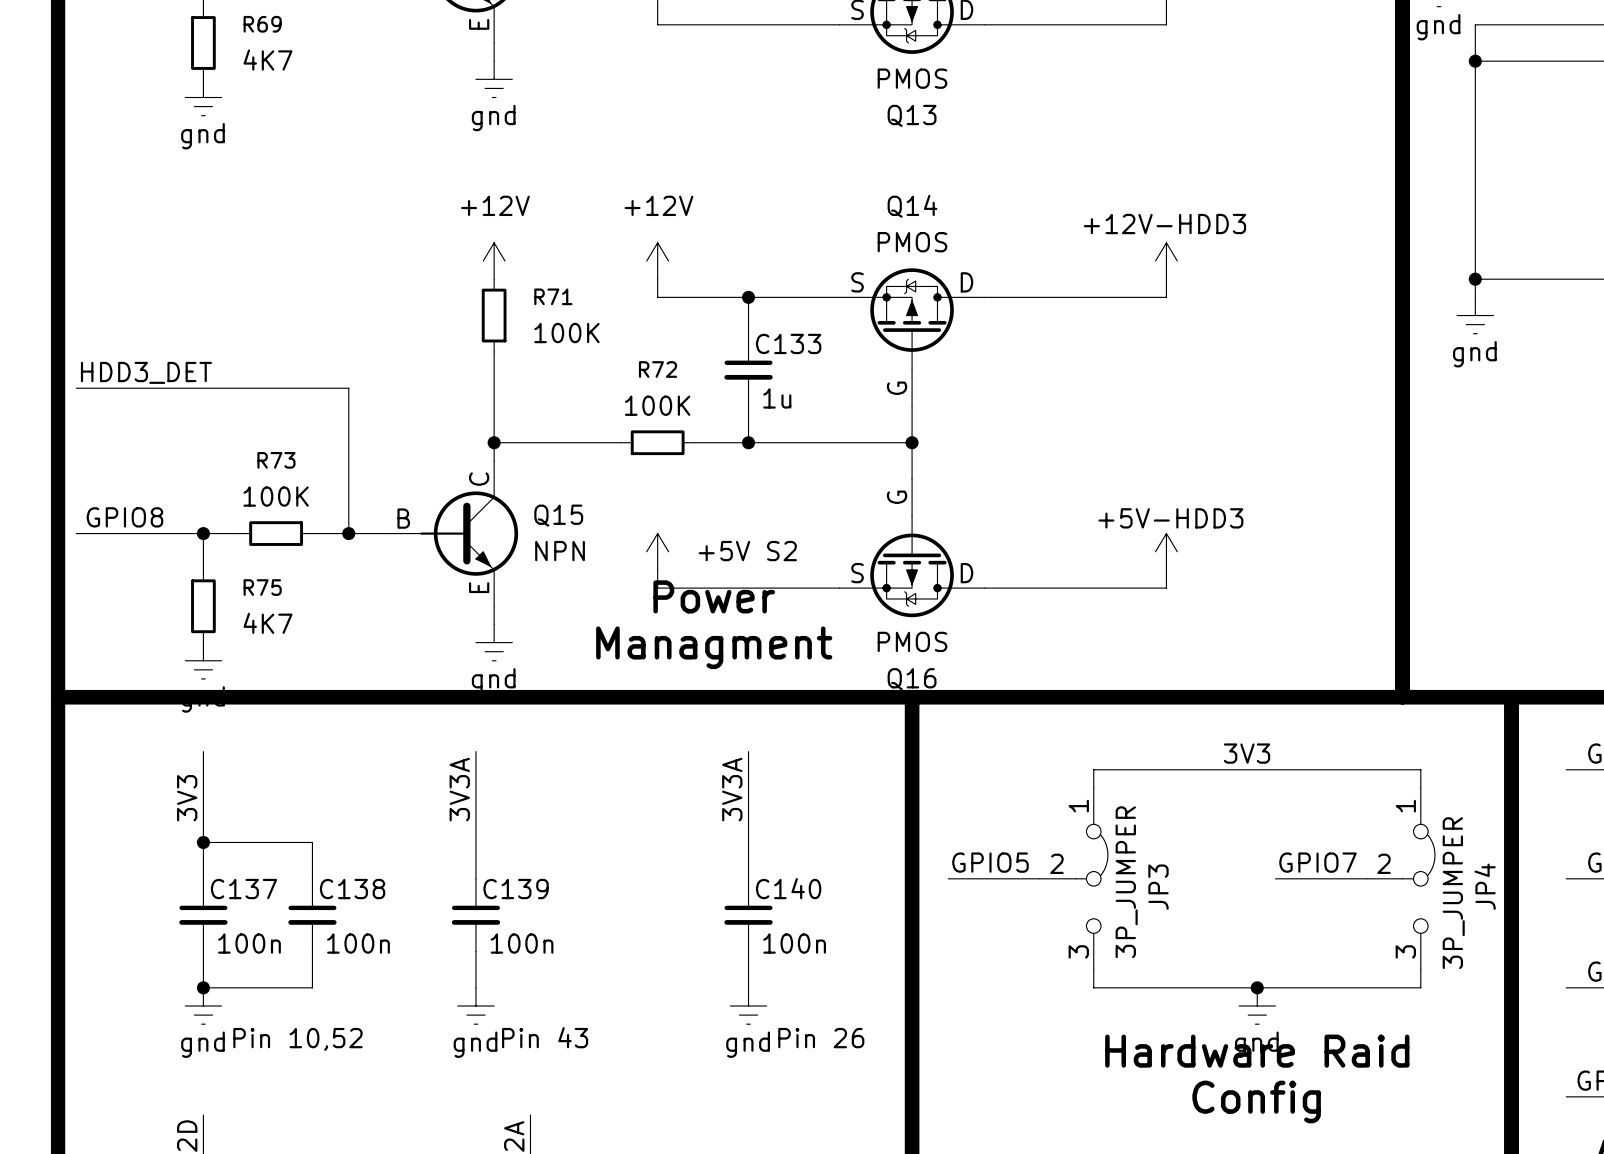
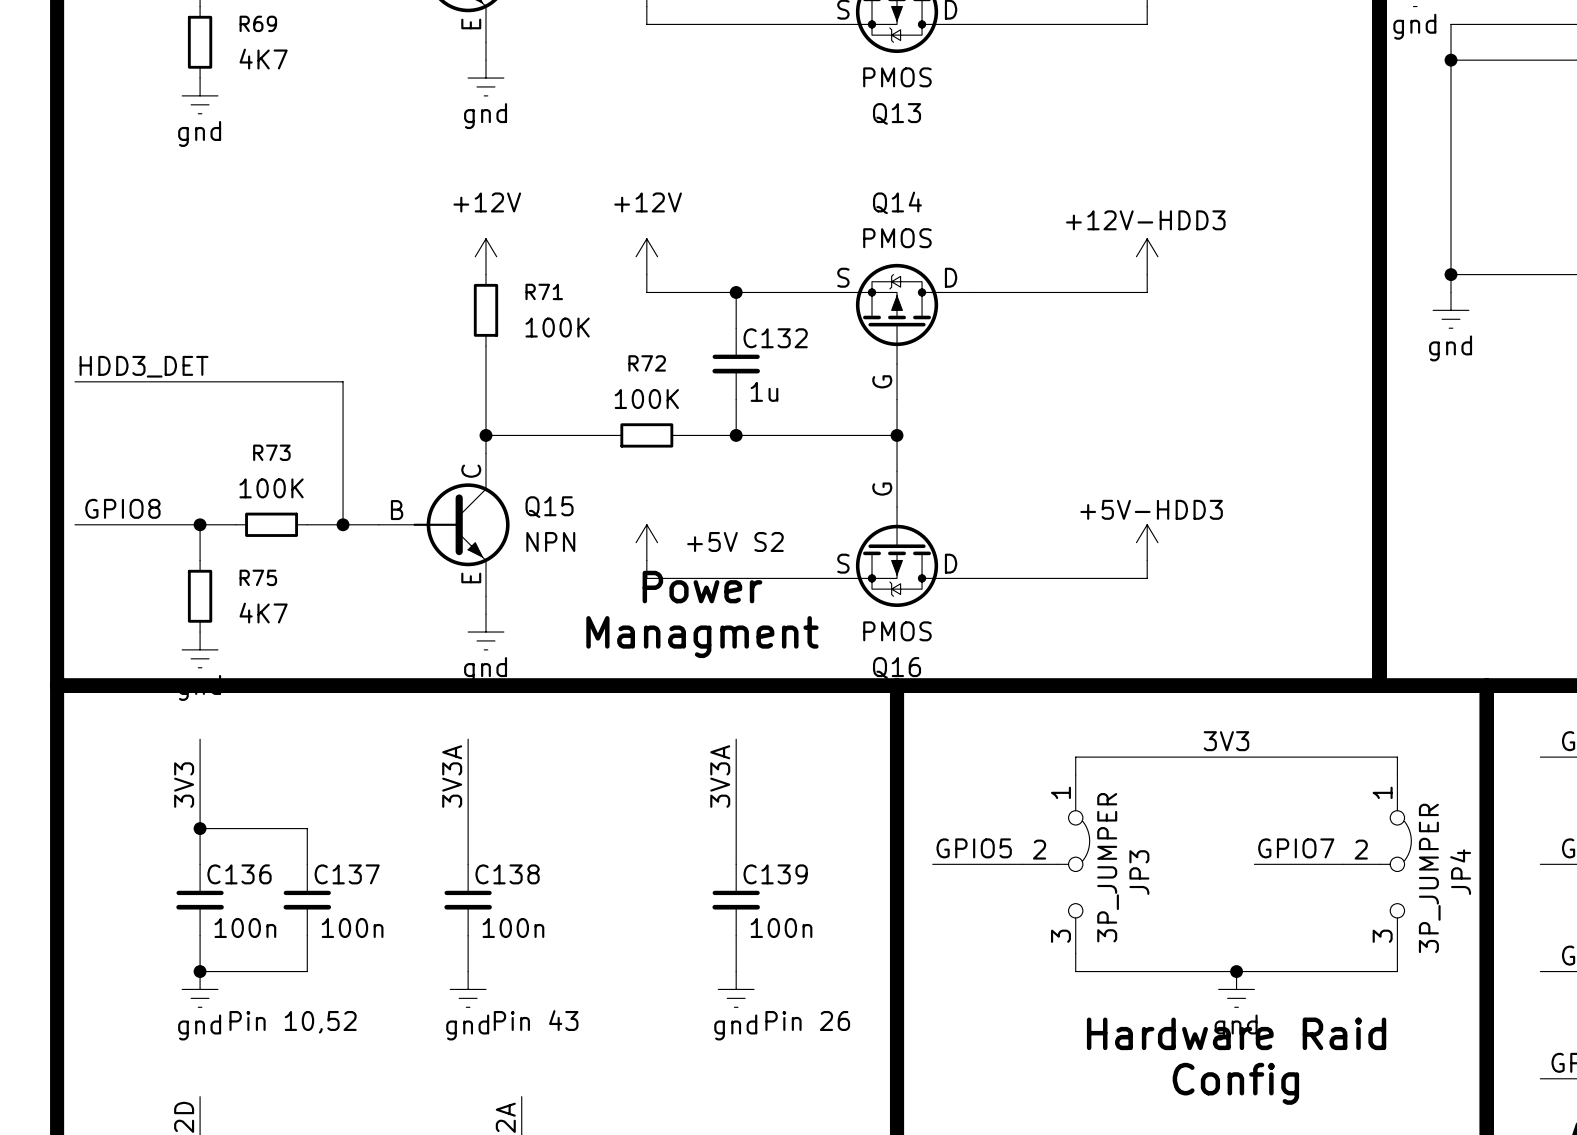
C133 name: C133 (788, 343) -> C132 (775, 338)
C140 name: C140 (788, 888) -> C139 (775, 874)
C137 name: C137 (243, 889) -> C136 (239, 874)
C138 name: C138 (352, 889) -> C137 (347, 874)
C139 name: C139 (516, 889) -> C138 (507, 874)

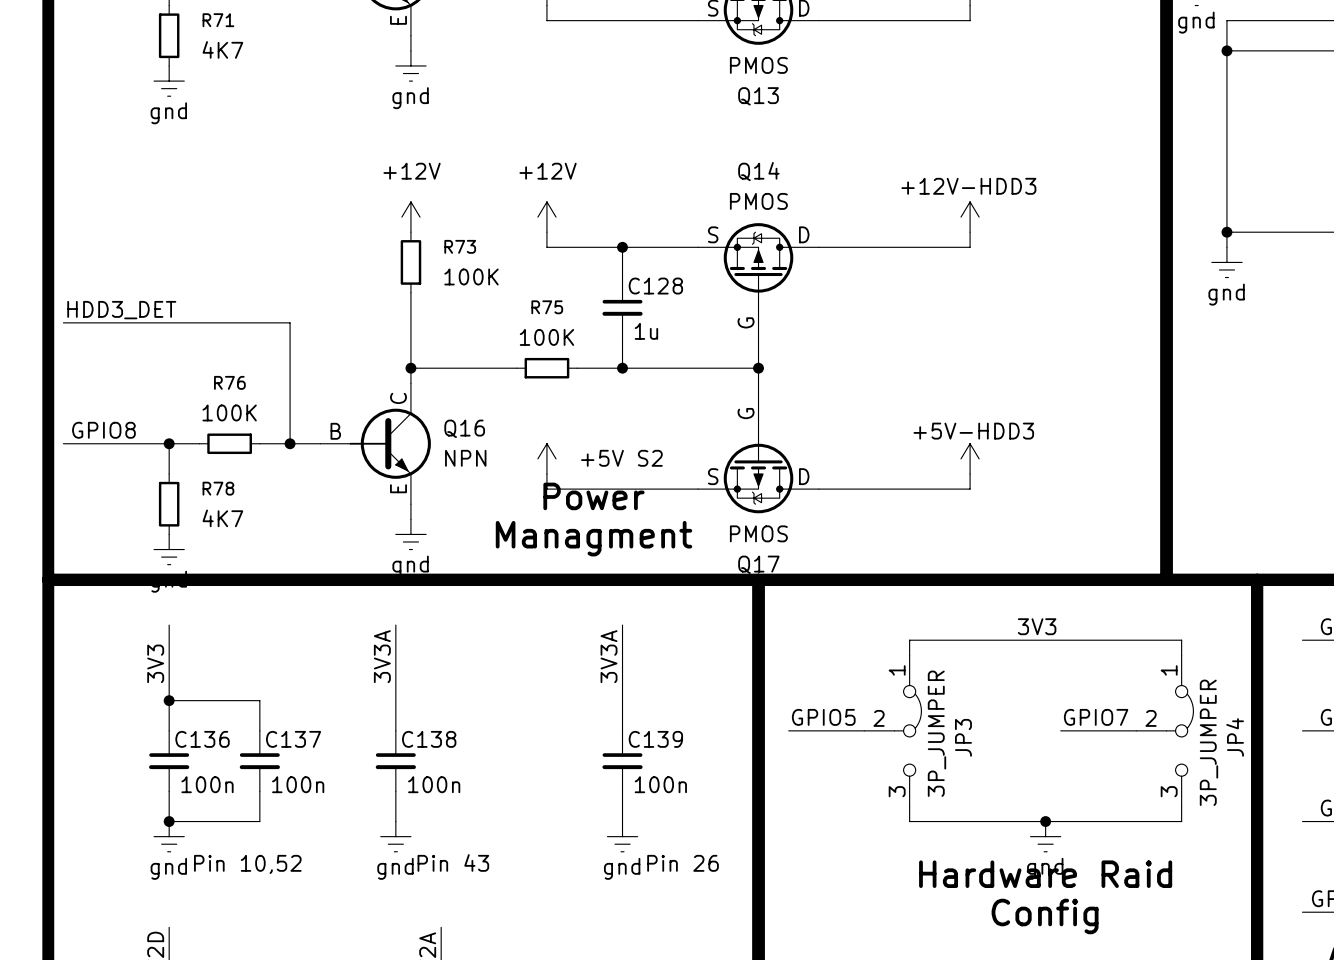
R69 name: R69 (258, 23) -> R71 (218, 20)
R71 name: R71 (544, 291) -> R73 (460, 246)
C132 name: C132 (775, 338) -> C128 (655, 286)
R72 name: R72 (647, 363) -> R75 (547, 307)
R73 name: R73 (271, 452) -> R76 (229, 382)
Q15 name: Q15 (549, 507) -> Q16 (464, 428)
R75 name: R75 (258, 577) -> R78 (218, 488)
Q16 name: Q16 (897, 667) -> Q17 (758, 564)

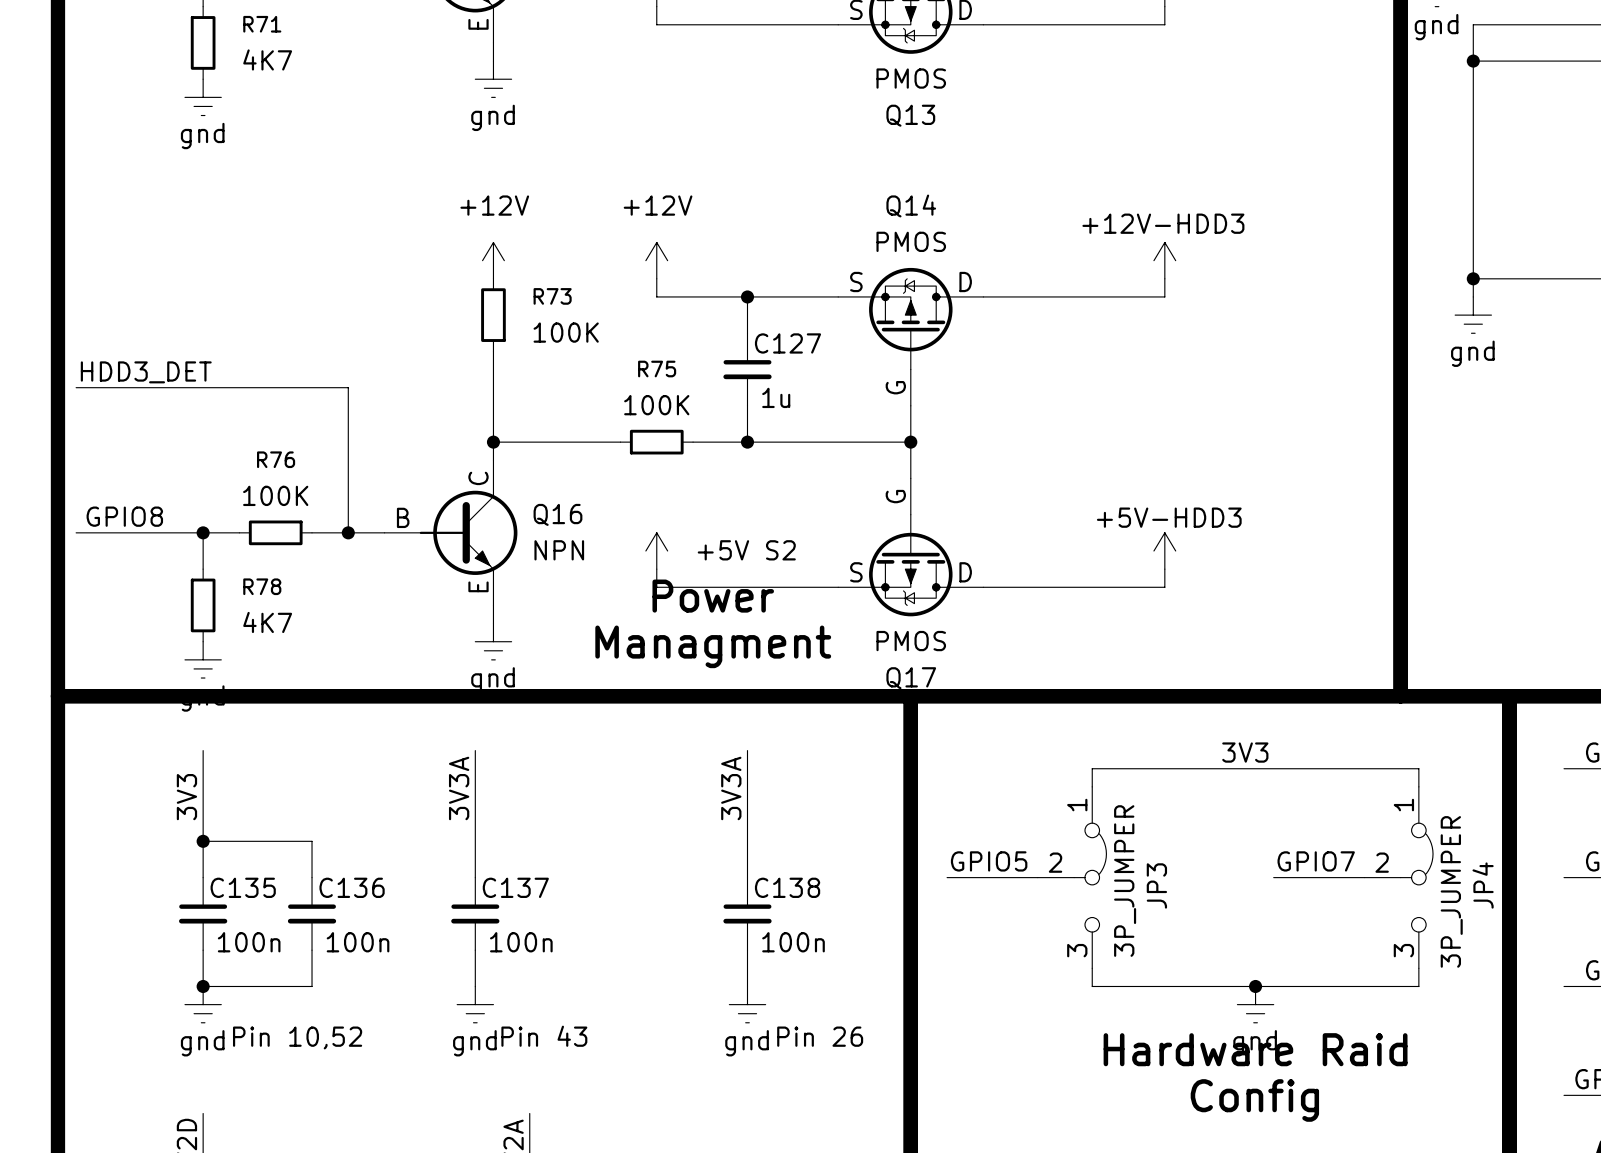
C128 name: C128 (655, 286) -> C127 (787, 343)
C136 name: C136 (202, 739) -> C135 (243, 887)
C137 name: C137 (293, 739) -> C136 (352, 887)
C138 name: C138 (429, 739) -> C137 (515, 887)
C139 name: C139 (655, 739) -> C138 (787, 887)

